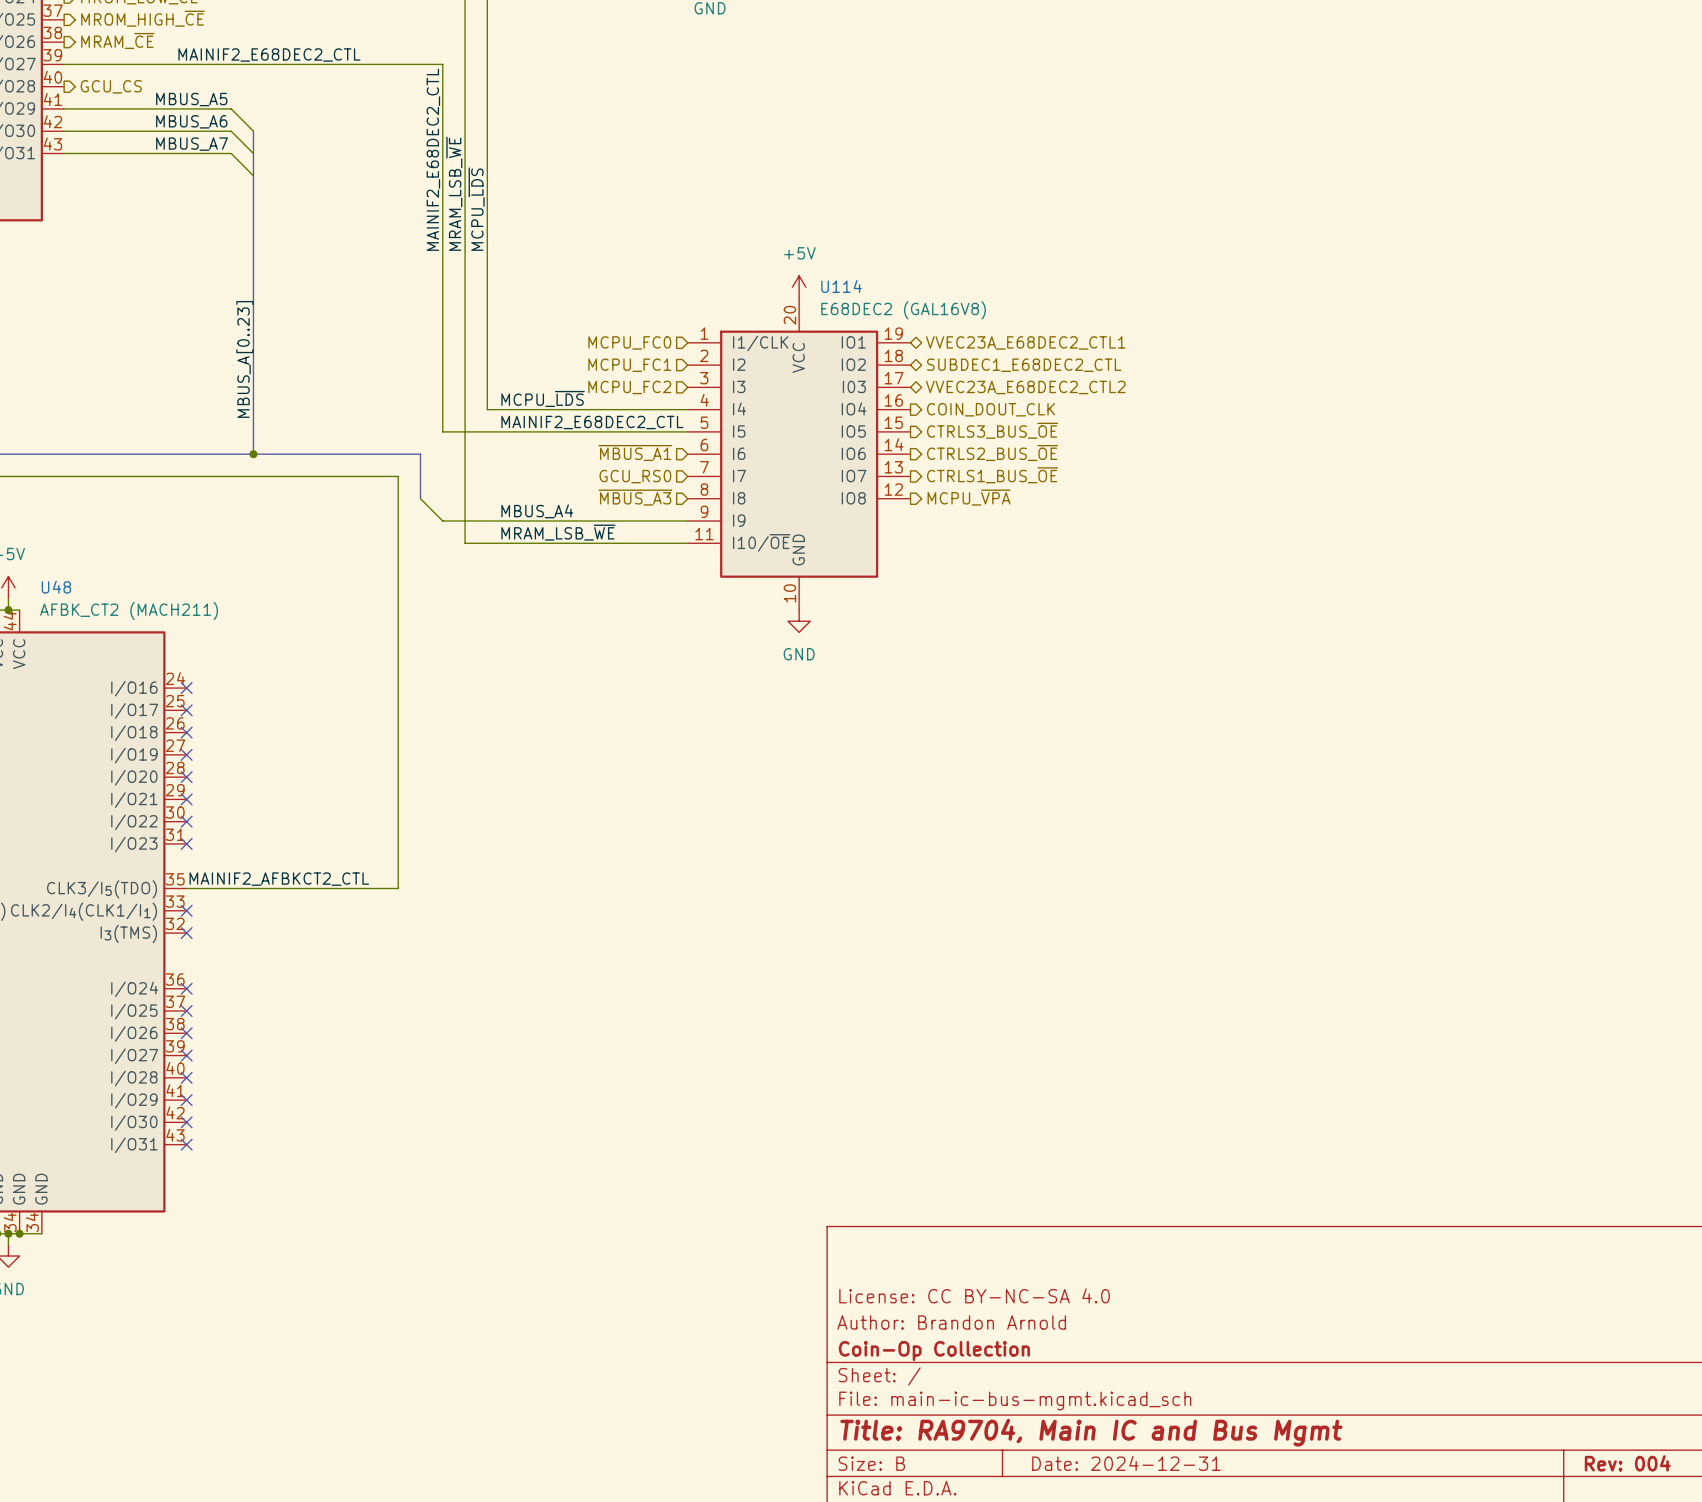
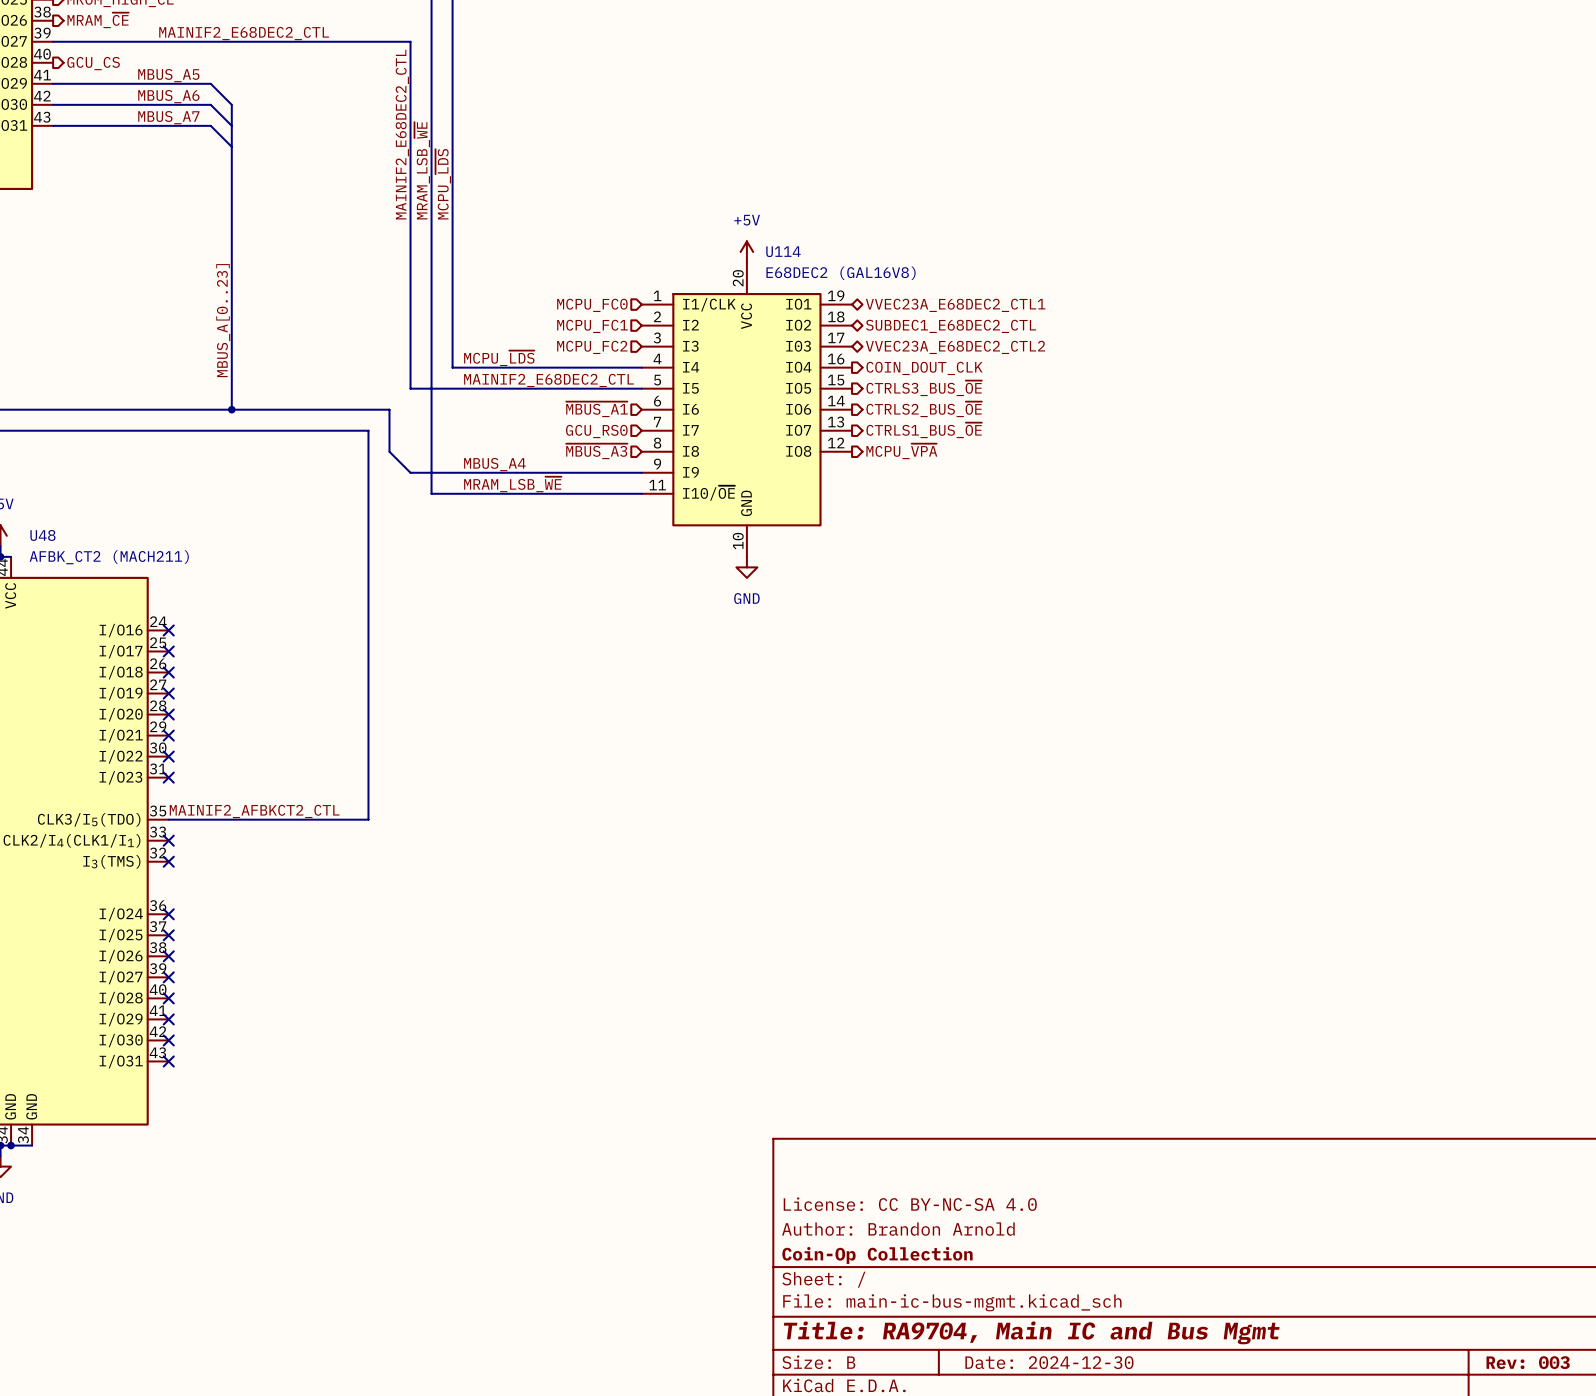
title block: Date: 2024-12-31 (1126, 1463) -> Date: 2024-12-30 (1049, 1362)
title block: Rev: 004 (1627, 1463) -> Rev: 003 (1528, 1362)

